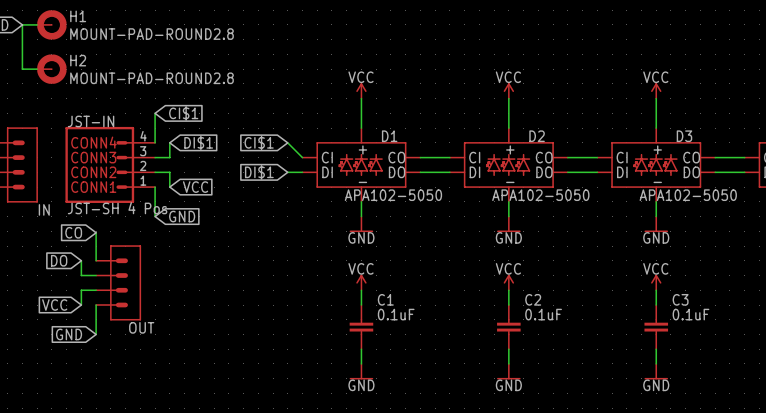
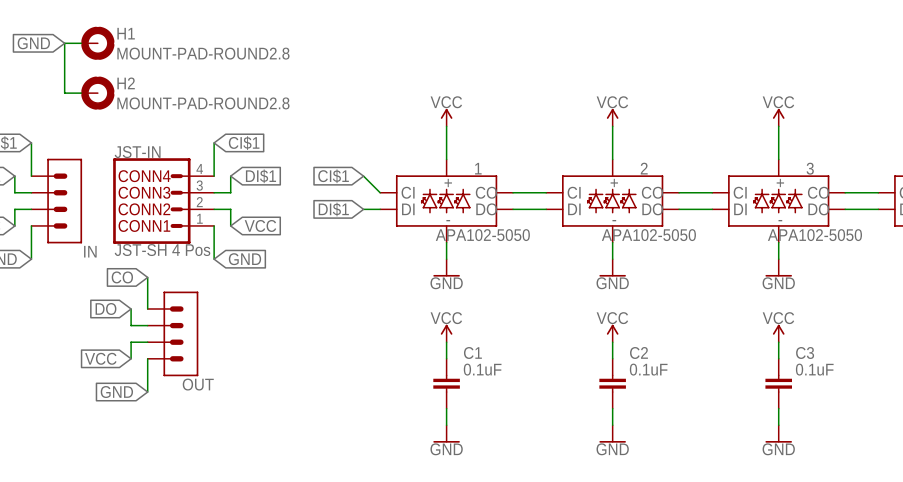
D1 name: D1 (389, 136) -> 1 (478, 168)
D2 name: D2 (537, 136) -> 2 (644, 168)
D3 name: D3 (684, 136) -> 3 (810, 168)

